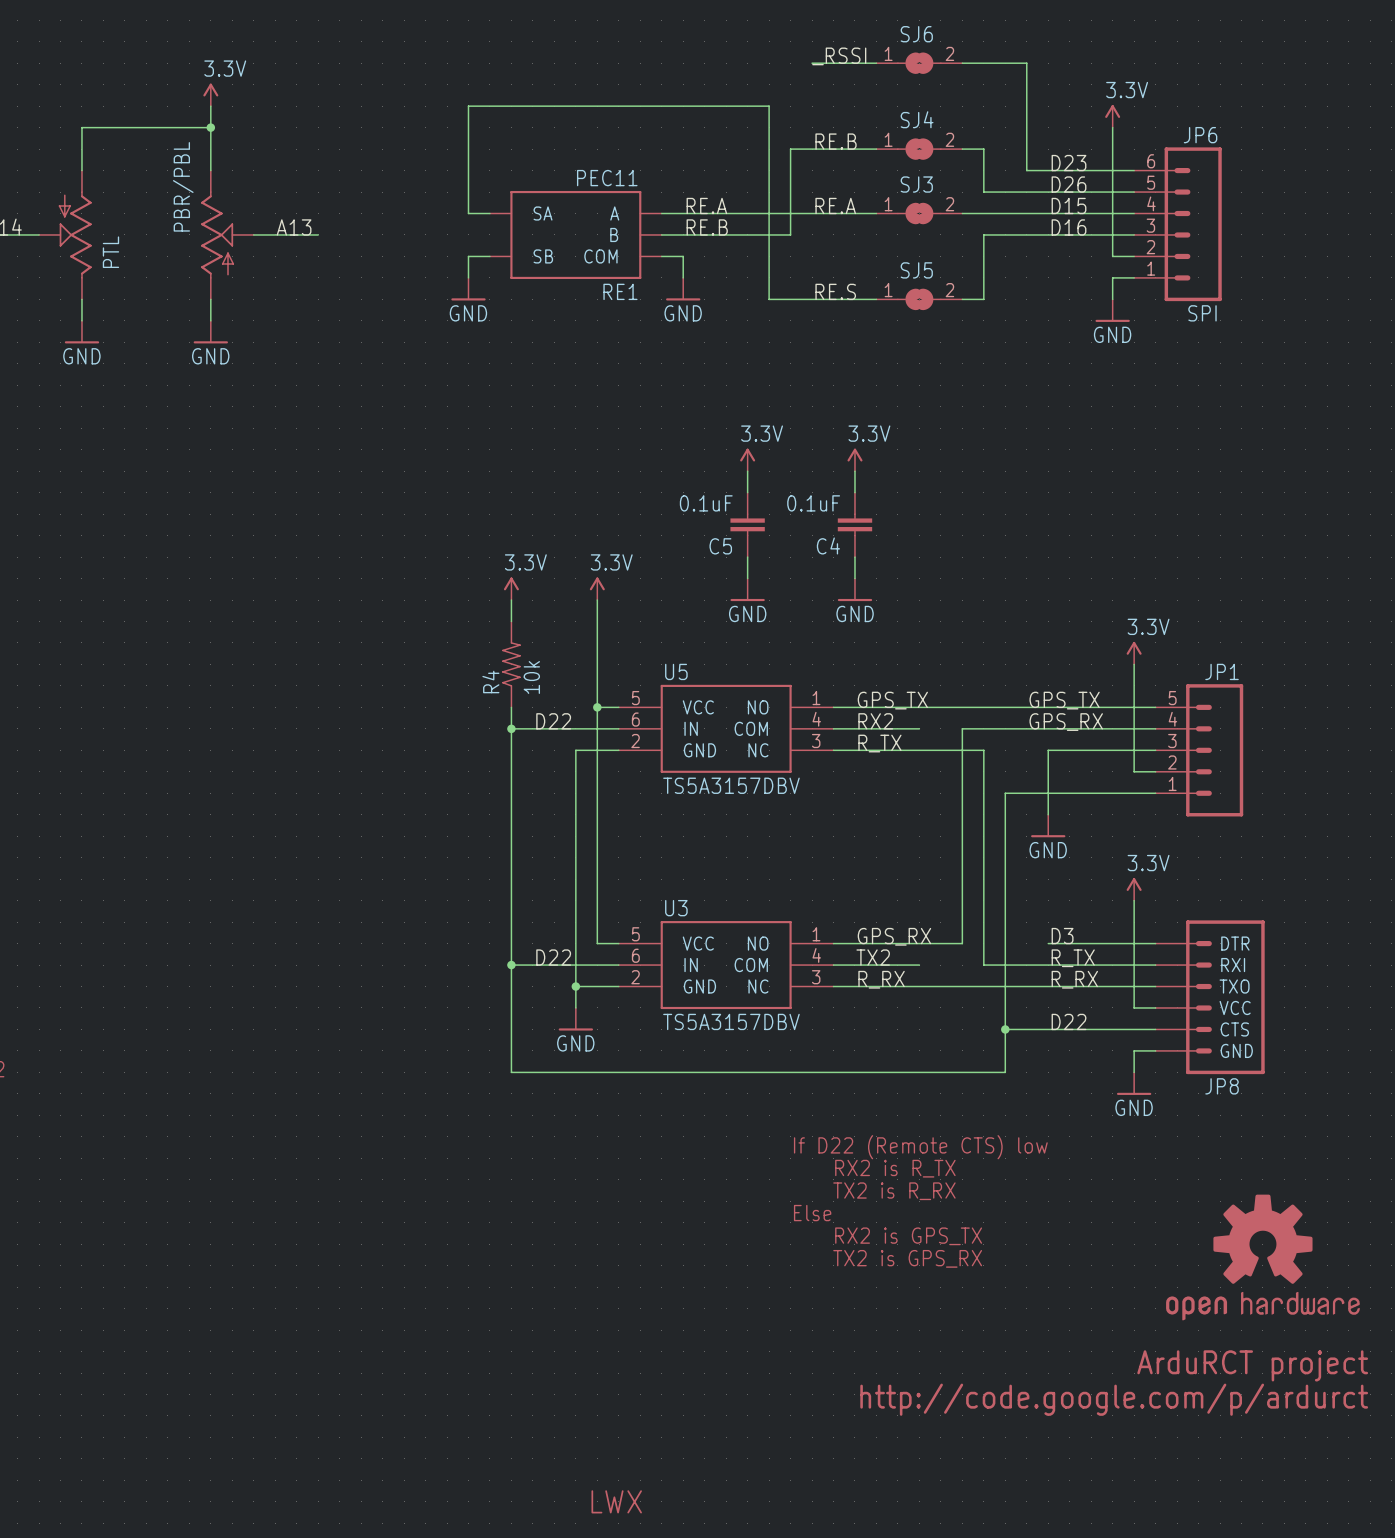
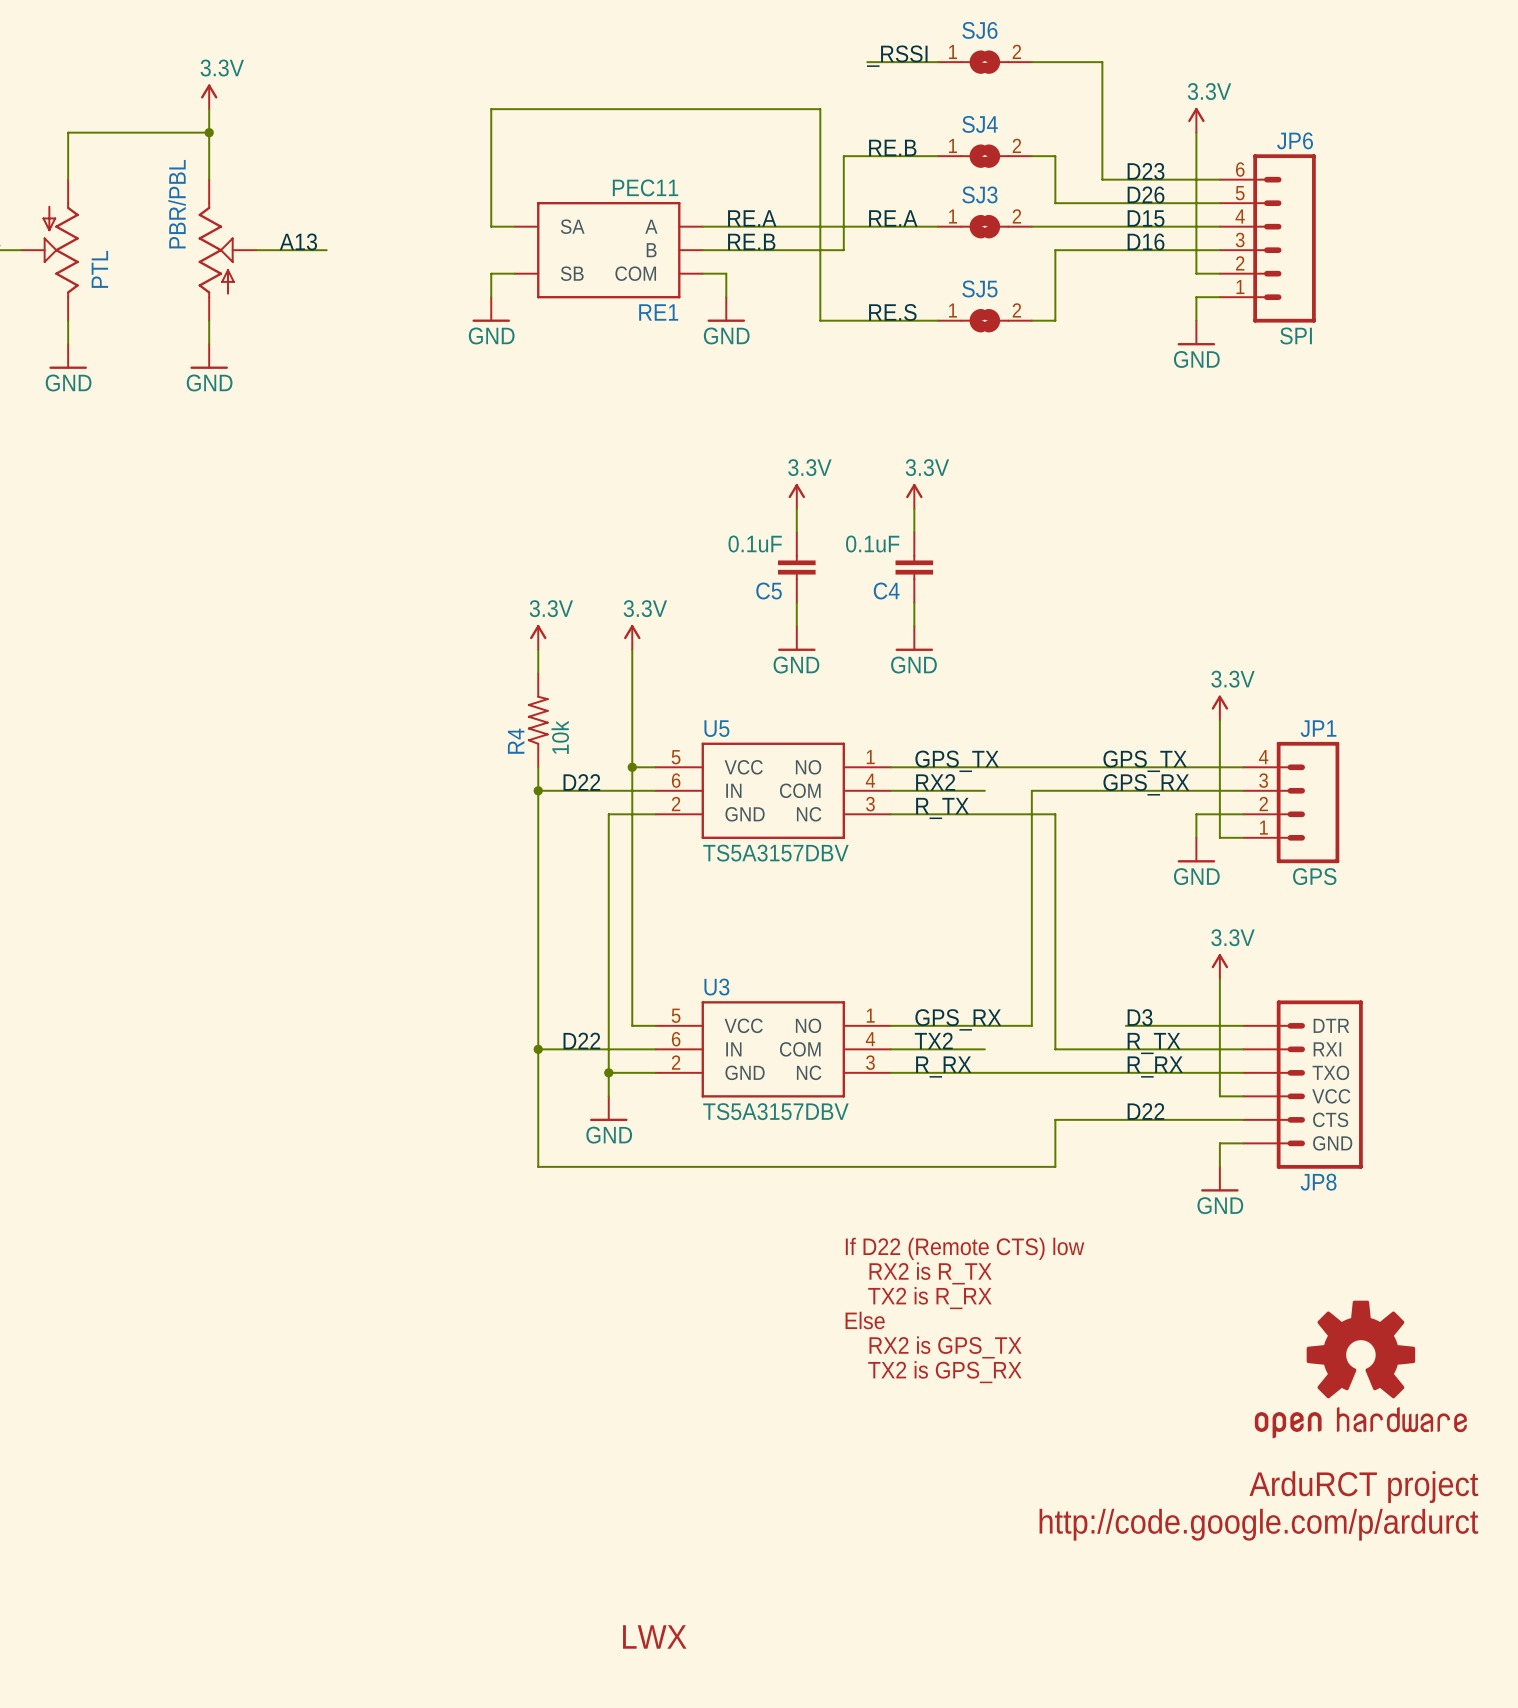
JP1 symbol: [1155, 684, 1244, 817] -> [1243, 741, 1340, 864]
wire: (1112, 750) (1048, 750) (1048, 814) -> (1196, 814) (1196, 837)
wire: (1155, 793) (1005, 793) (1005, 1072) (983, 1072) -> (1078, 1119) (1055, 1119) (1055, 1166)
JP1 value: none -> GPS (1314, 876)
power symbol position: GND (1048, 826) -> GND (1196, 850)
junction: (1005, 1029) -> none

